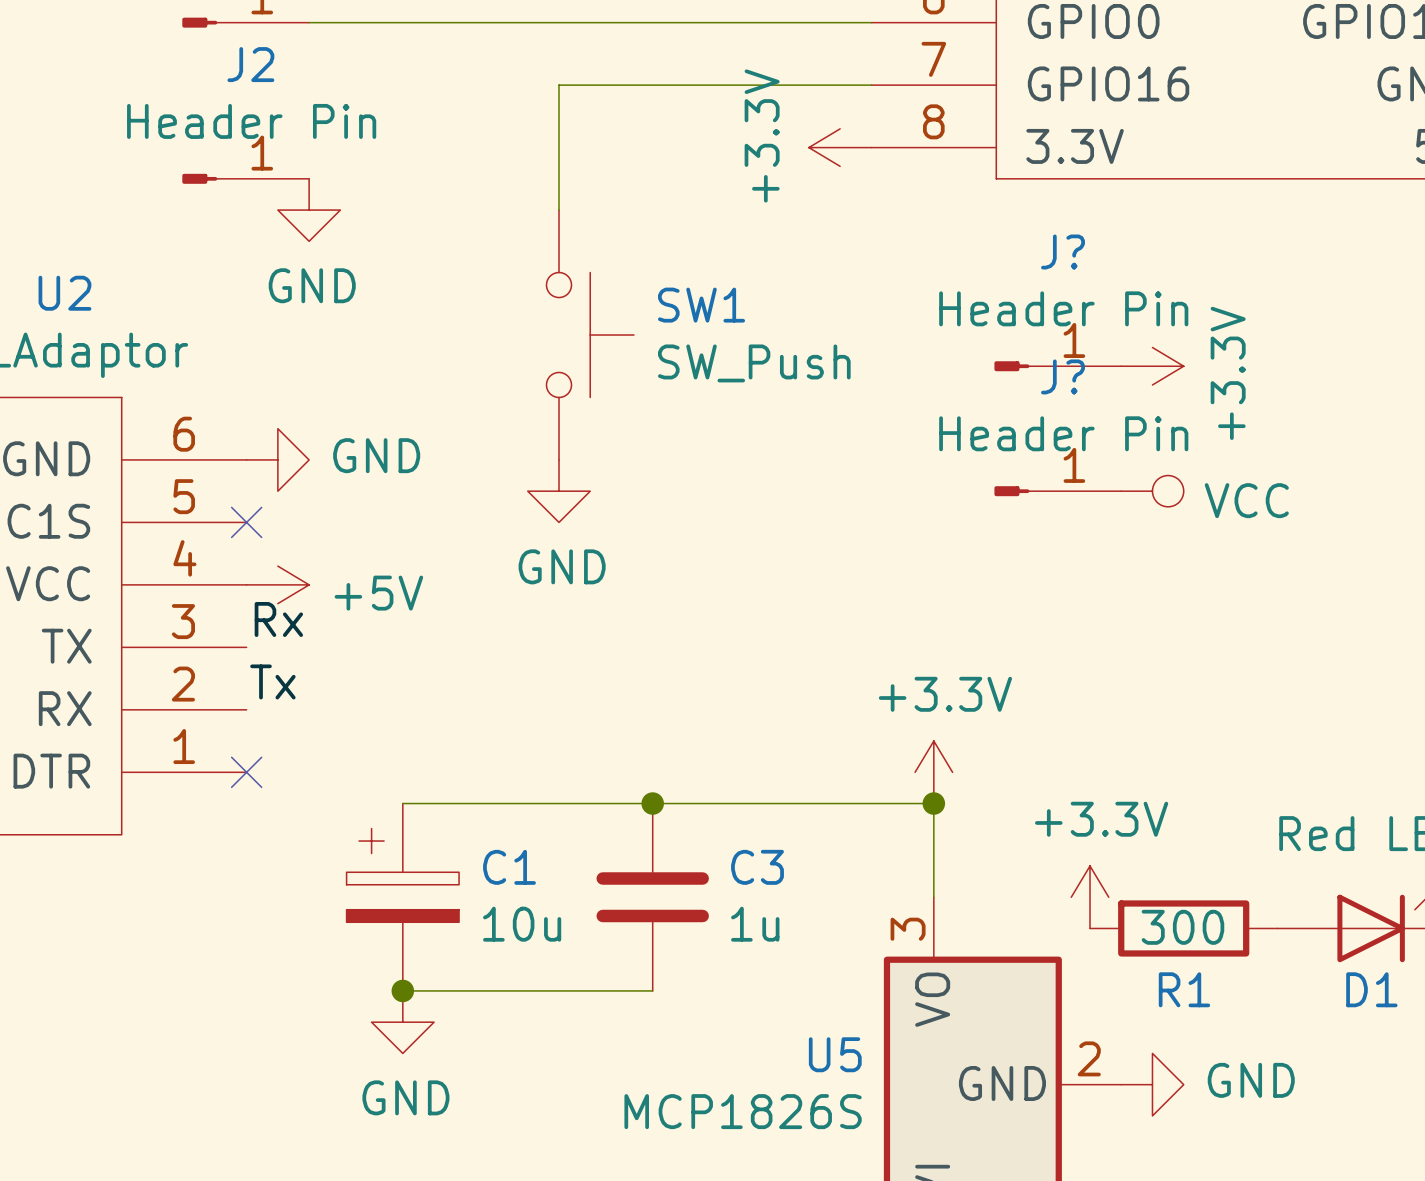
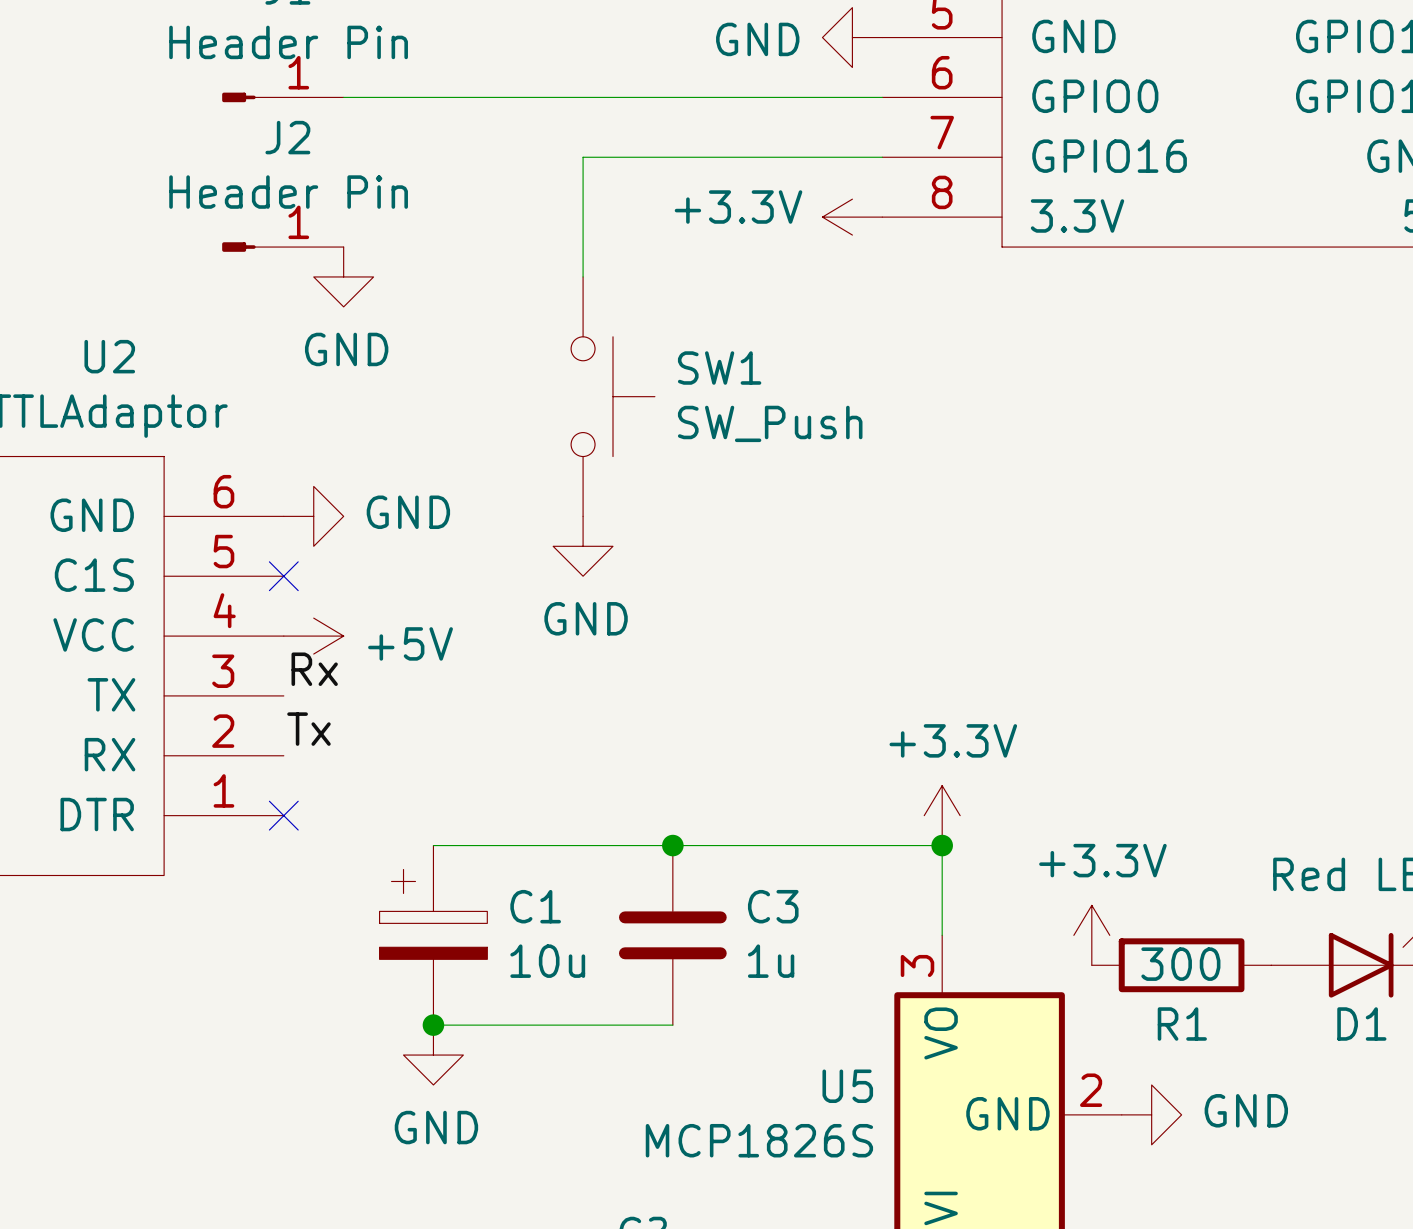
power symbol text rotation: 0° (762, 135) -> 90° clockwise (738, 207)
J?: Header Pin (1057, 366) -> none
power symbol: +3.3V (1152, 366) -> none
J?: Header Pin (1057, 491) -> none
power symbol: VCC (1152, 491) -> none

